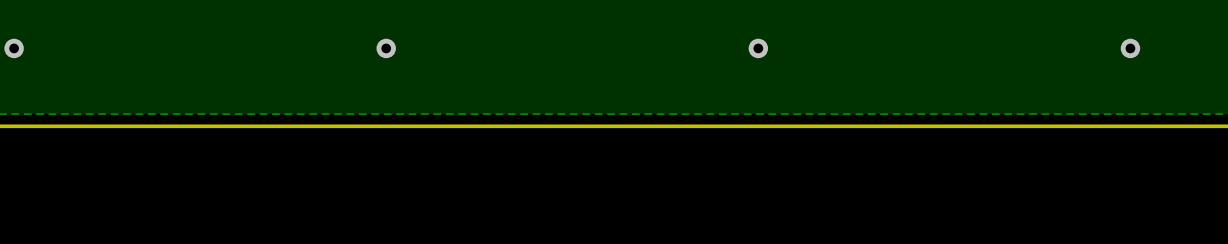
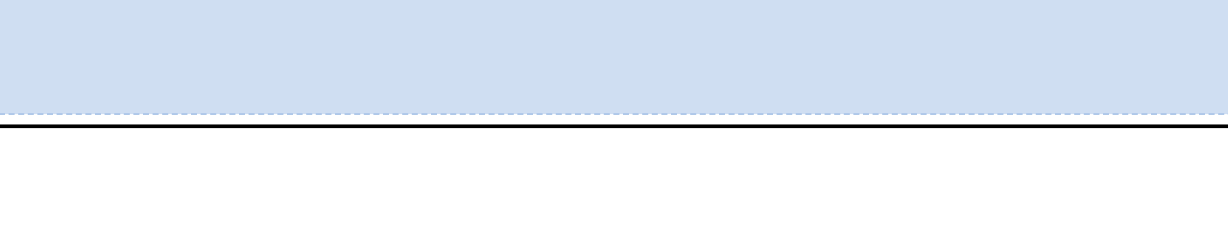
via: (14, 48) -> none
via: (386, 48) -> none
via: (758, 48) -> none
via: (1130, 48) -> none

